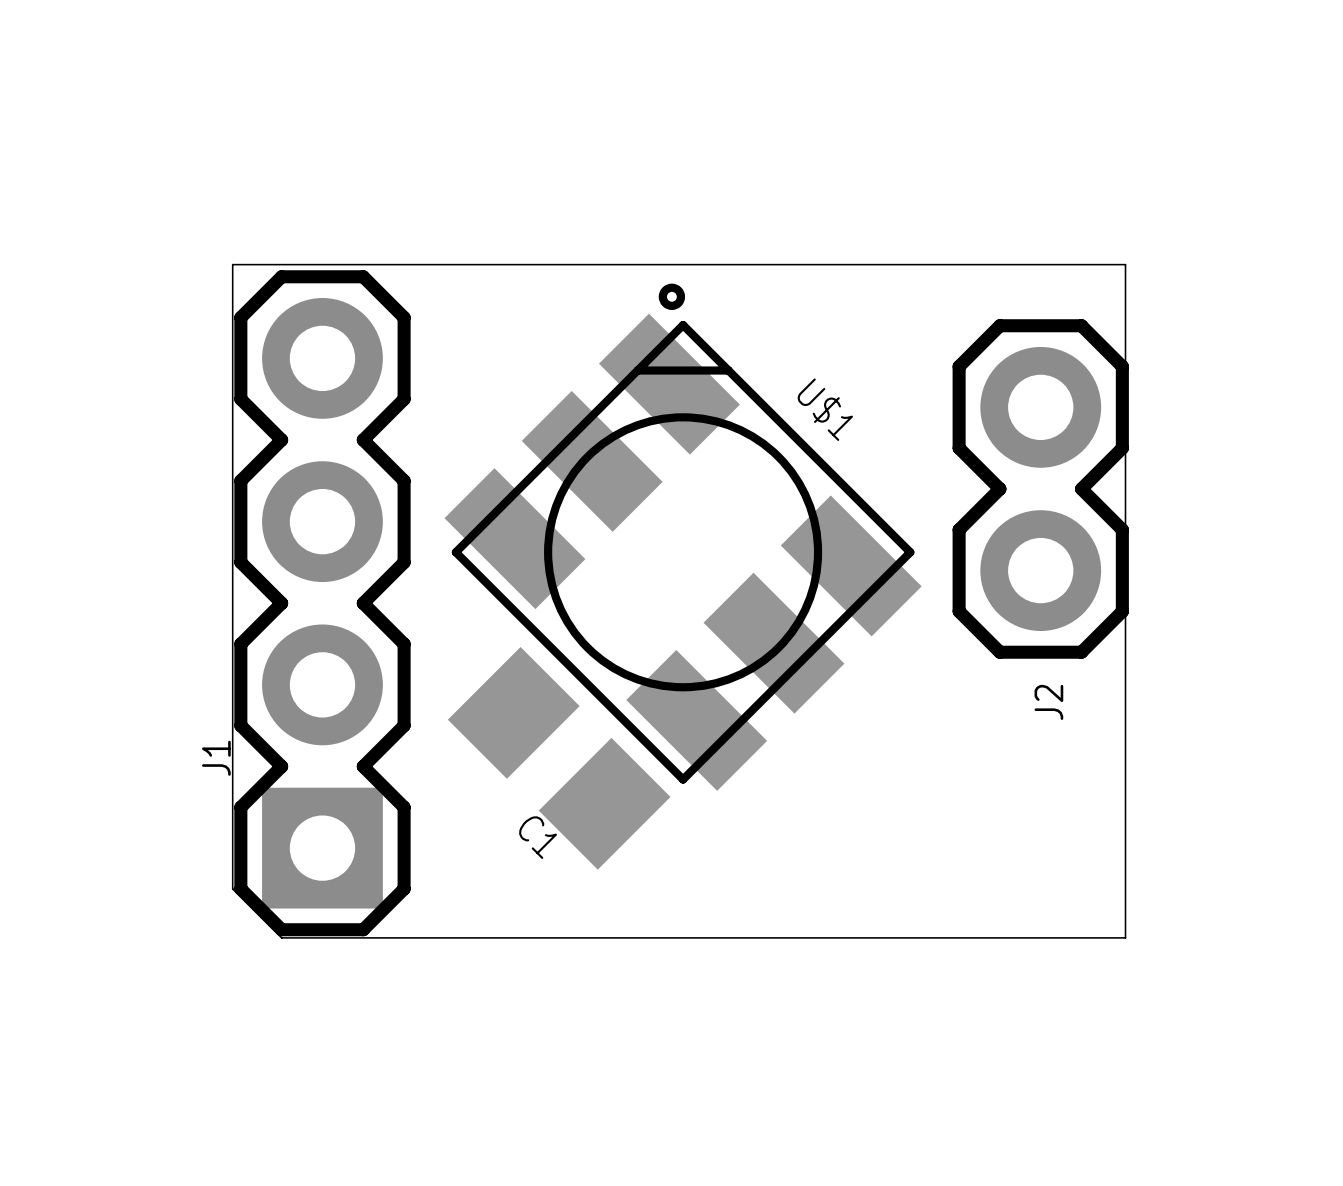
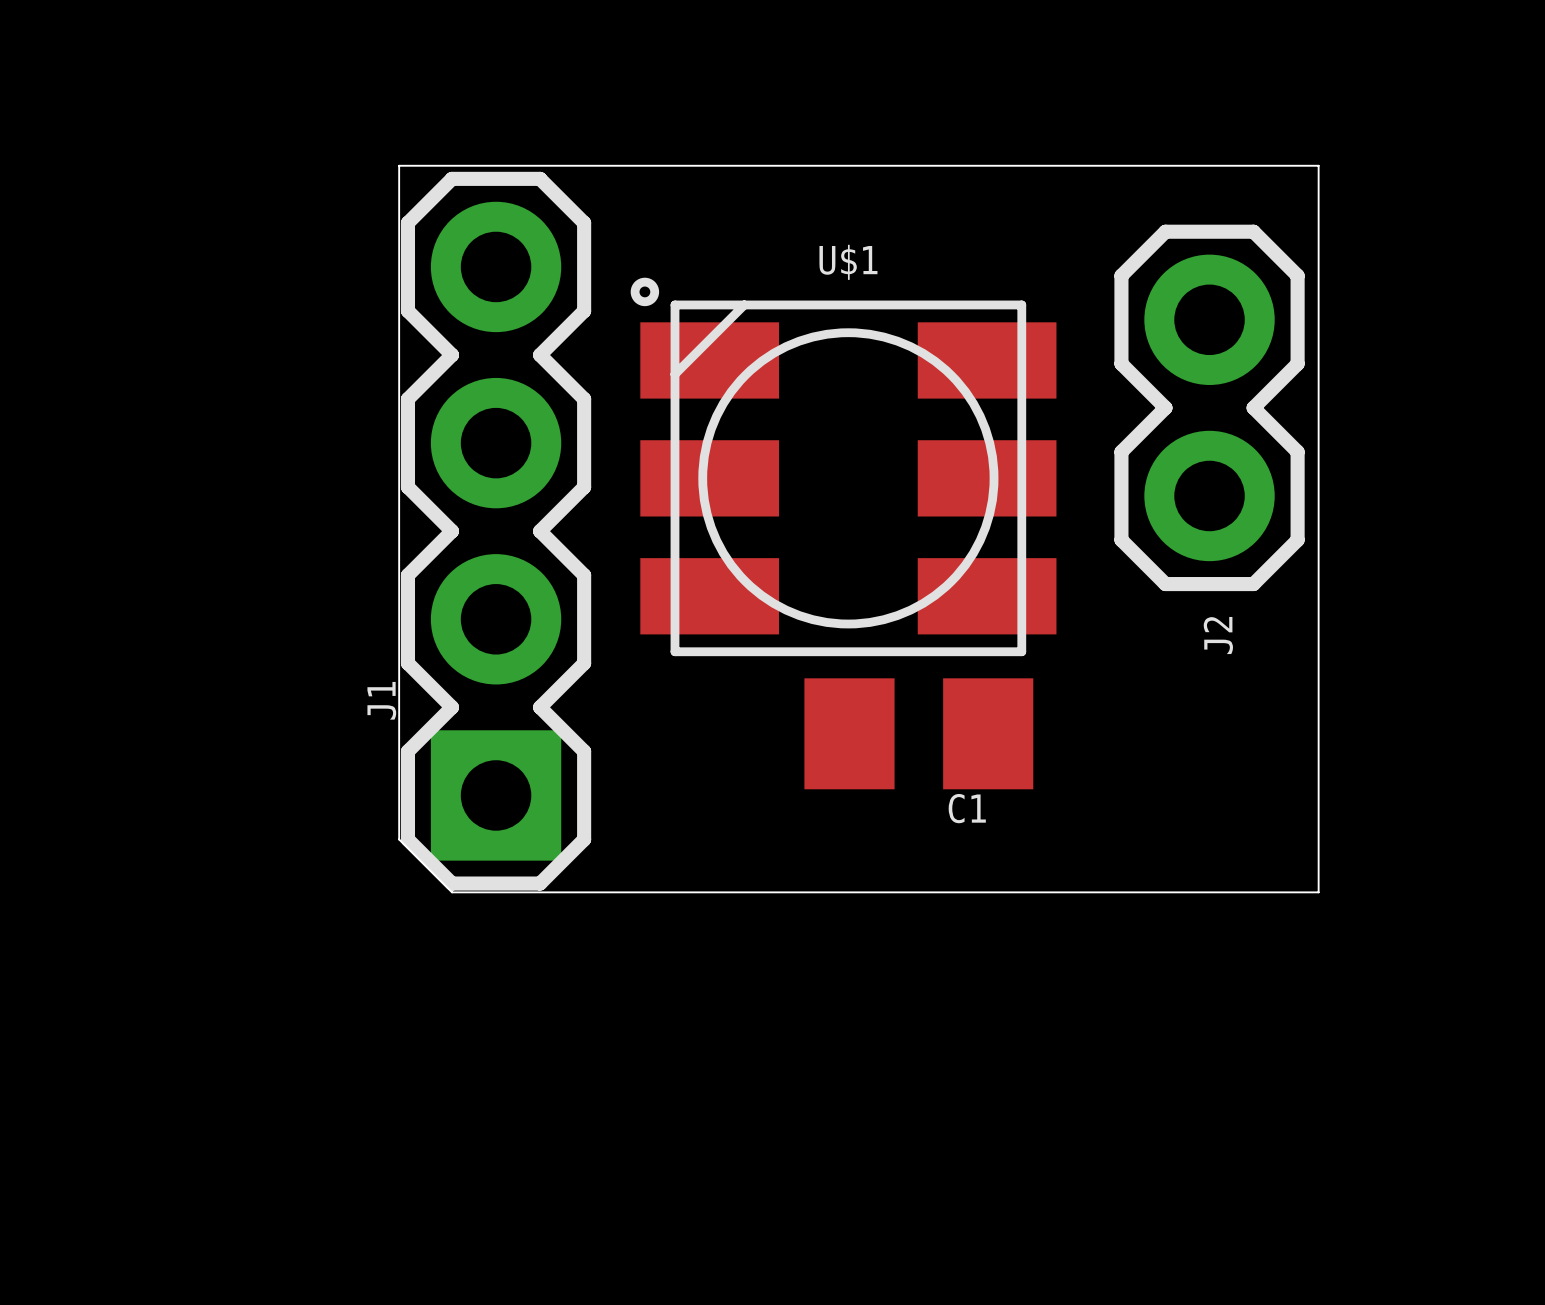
board edge: (232, 264) (1125, 264) (1125, 937) (281, 937) (232, 888) (232, 264) -> (399, 165) (399, 839) (452, 892) (1318, 892) (1318, 165) (399, 165)
J2 position: (1040, 488) -> (1209, 407)
U$1 rotation: 0° (683, 537) -> 45° counterclockwise (843, 466)
J1 position: (322, 603) -> (496, 531)
C1 rotation: 0° (559, 758) -> 45° counterclockwise (918, 733)
C1 position: (559, 758) -> (918, 733)

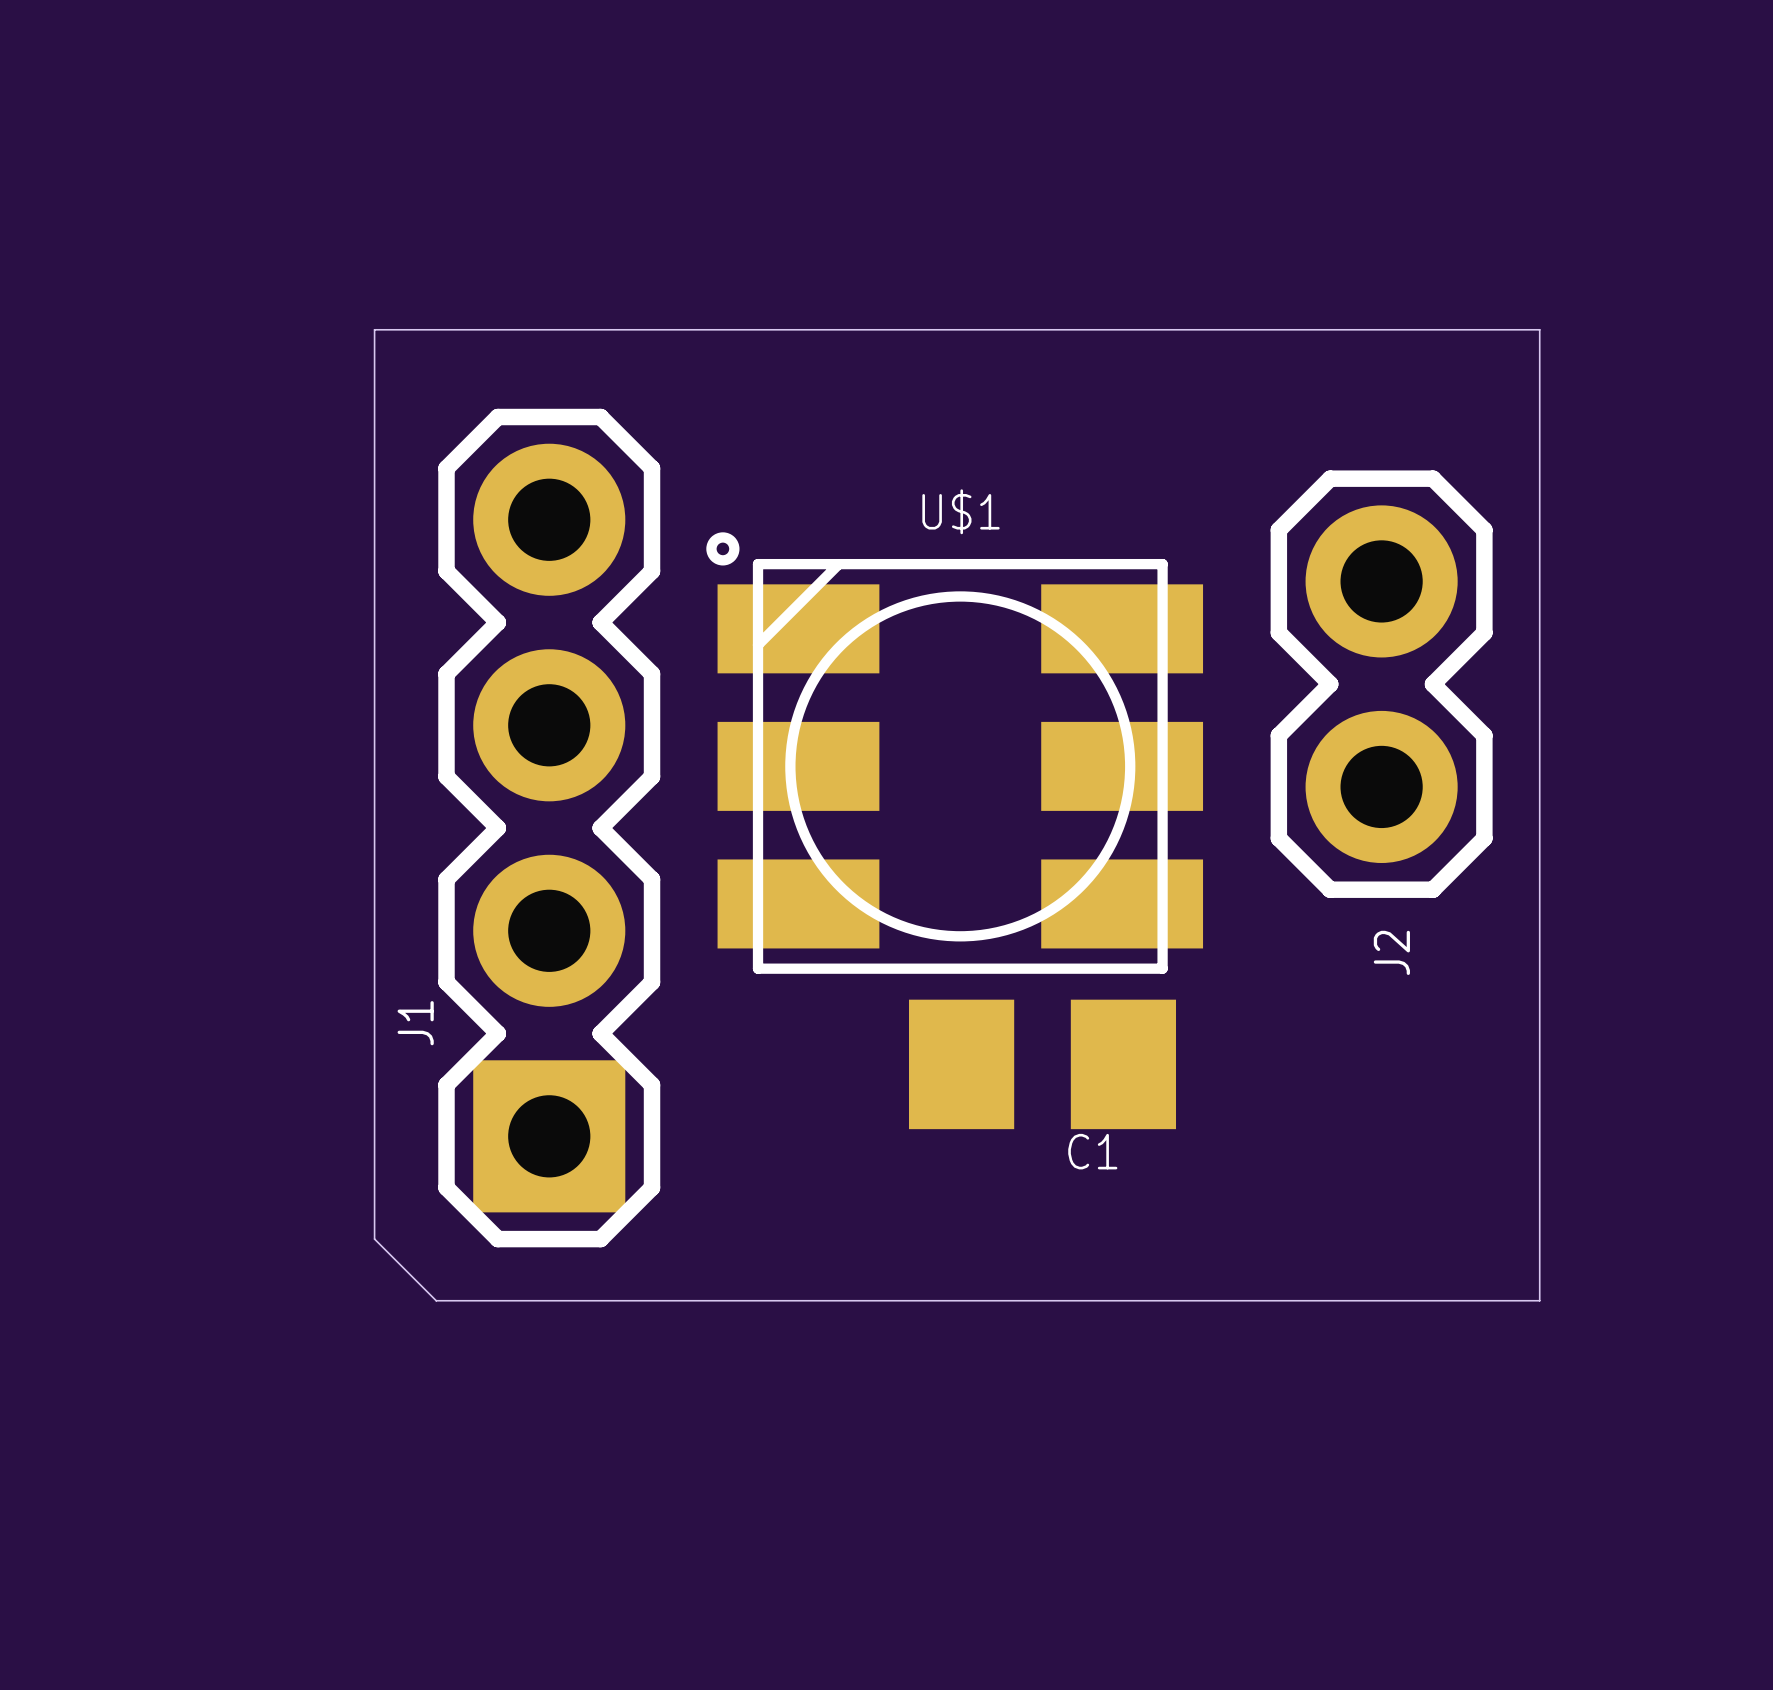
board edge: (399, 165) (1318, 165) (1318, 892) (452, 892) (399, 839) (399, 165) -> (374, 329) (374, 1239) (436, 1300) (1539, 1300) (1539, 329) (374, 329)

